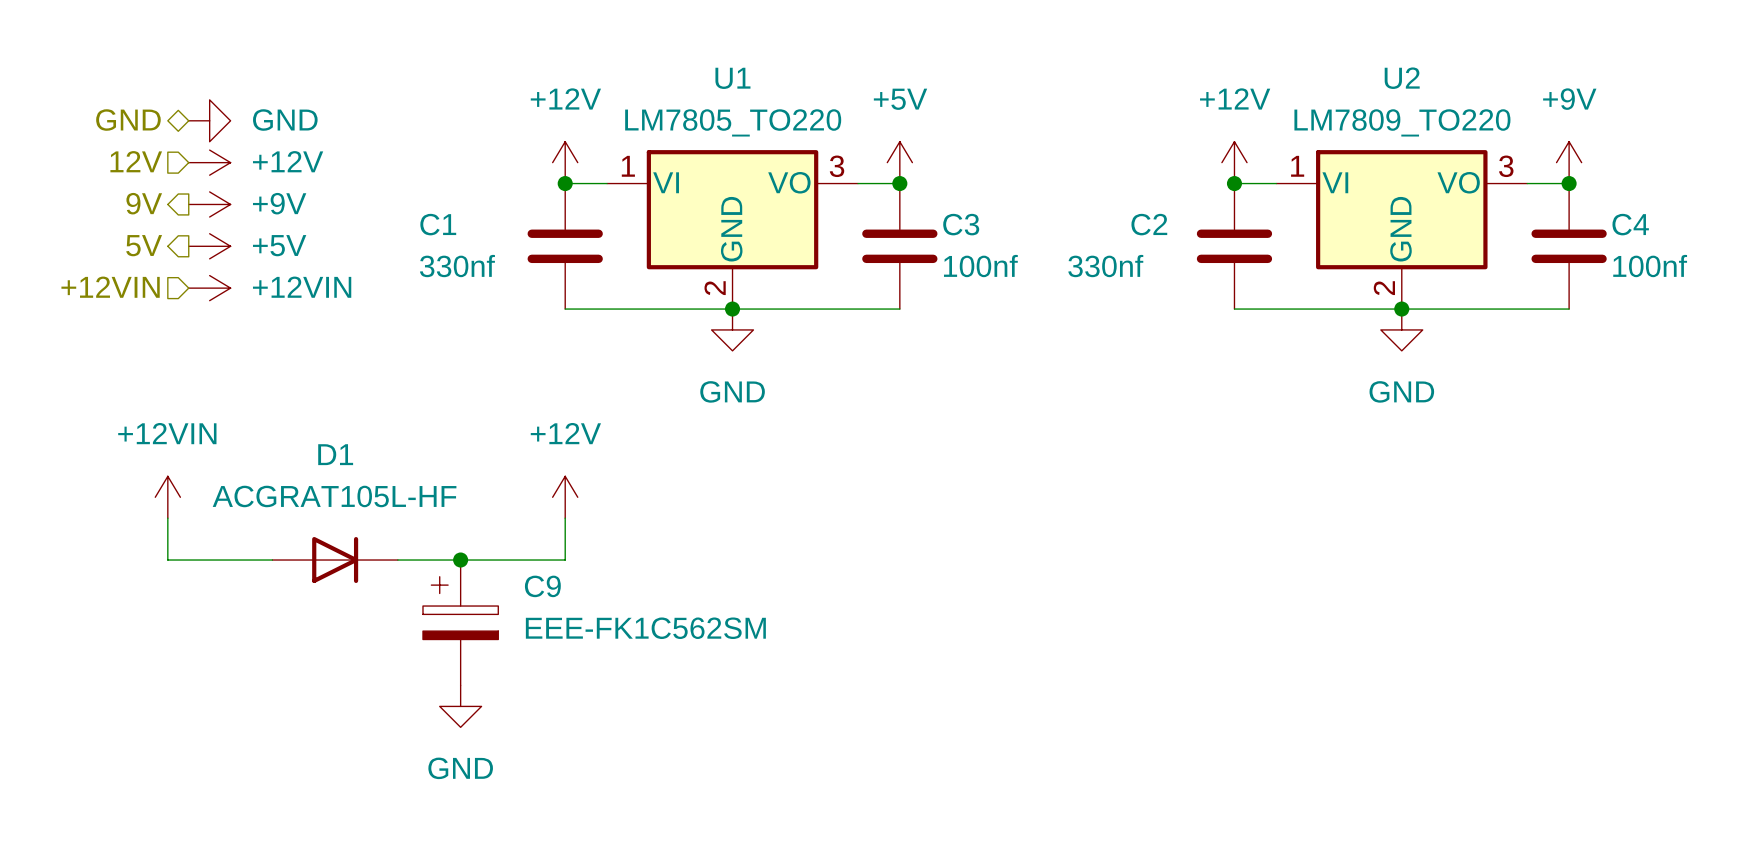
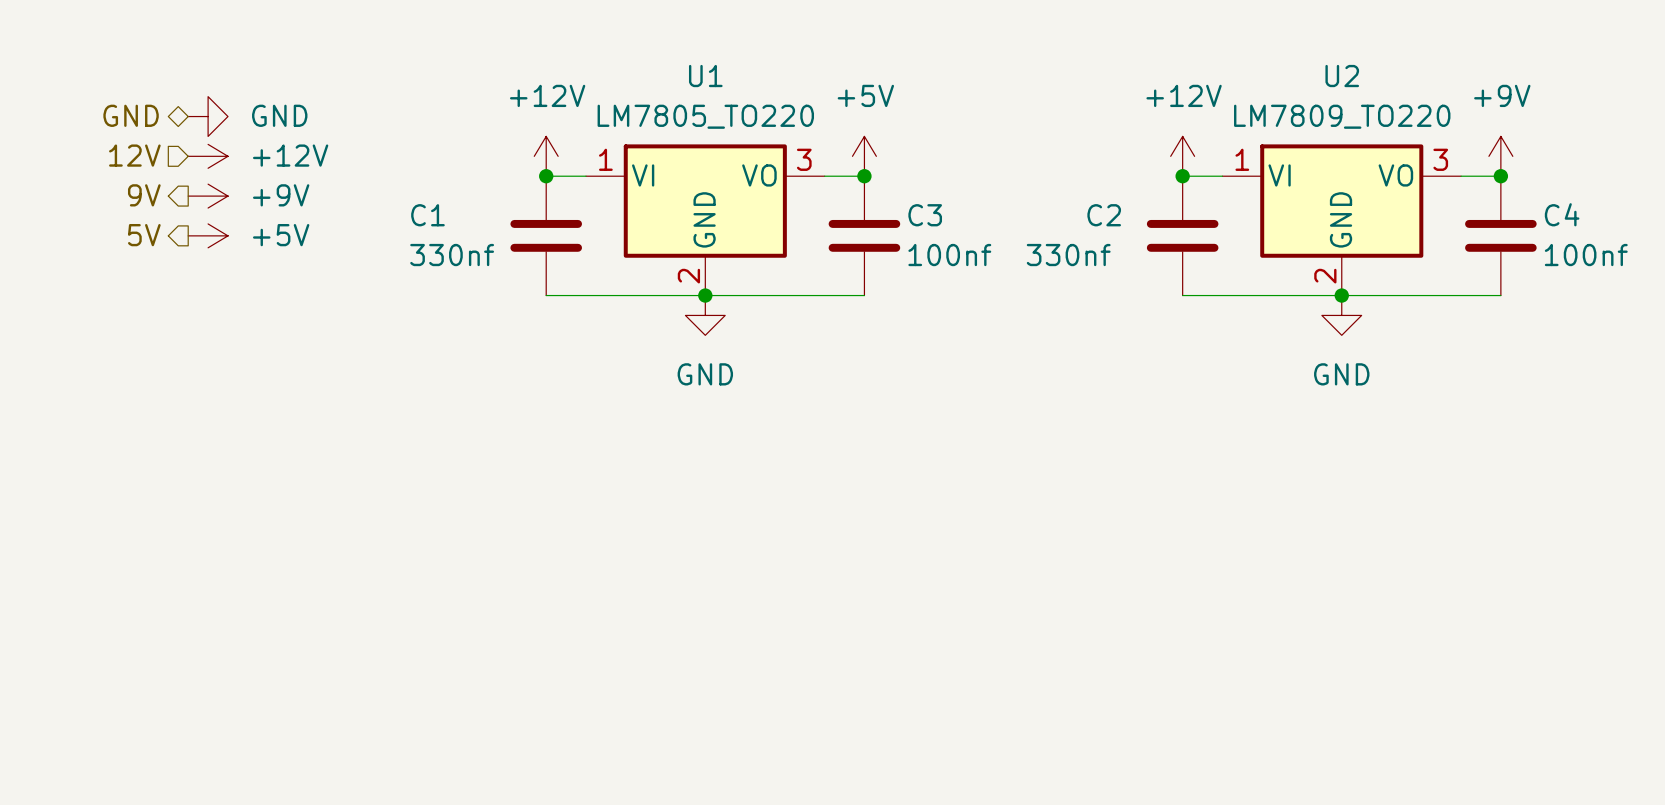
hierarchical label: +12VIN (110, 287) -> none
power symbol: +12VIN (209, 288) -> none
power symbol: +12VIN (167, 497) -> none
power symbol: +12V (565, 497) -> none
wire: (167, 518) (167, 560) (272, 560) -> none
wire: (565, 518) (565, 560) (397, 560) -> none
D1: ACGRAT105L-HF (335, 560) -> none
junction: (460, 560) -> none
C9: EEE-FK1C562SM (460, 622) -> none
power symbol: GND (460, 706) -> none

